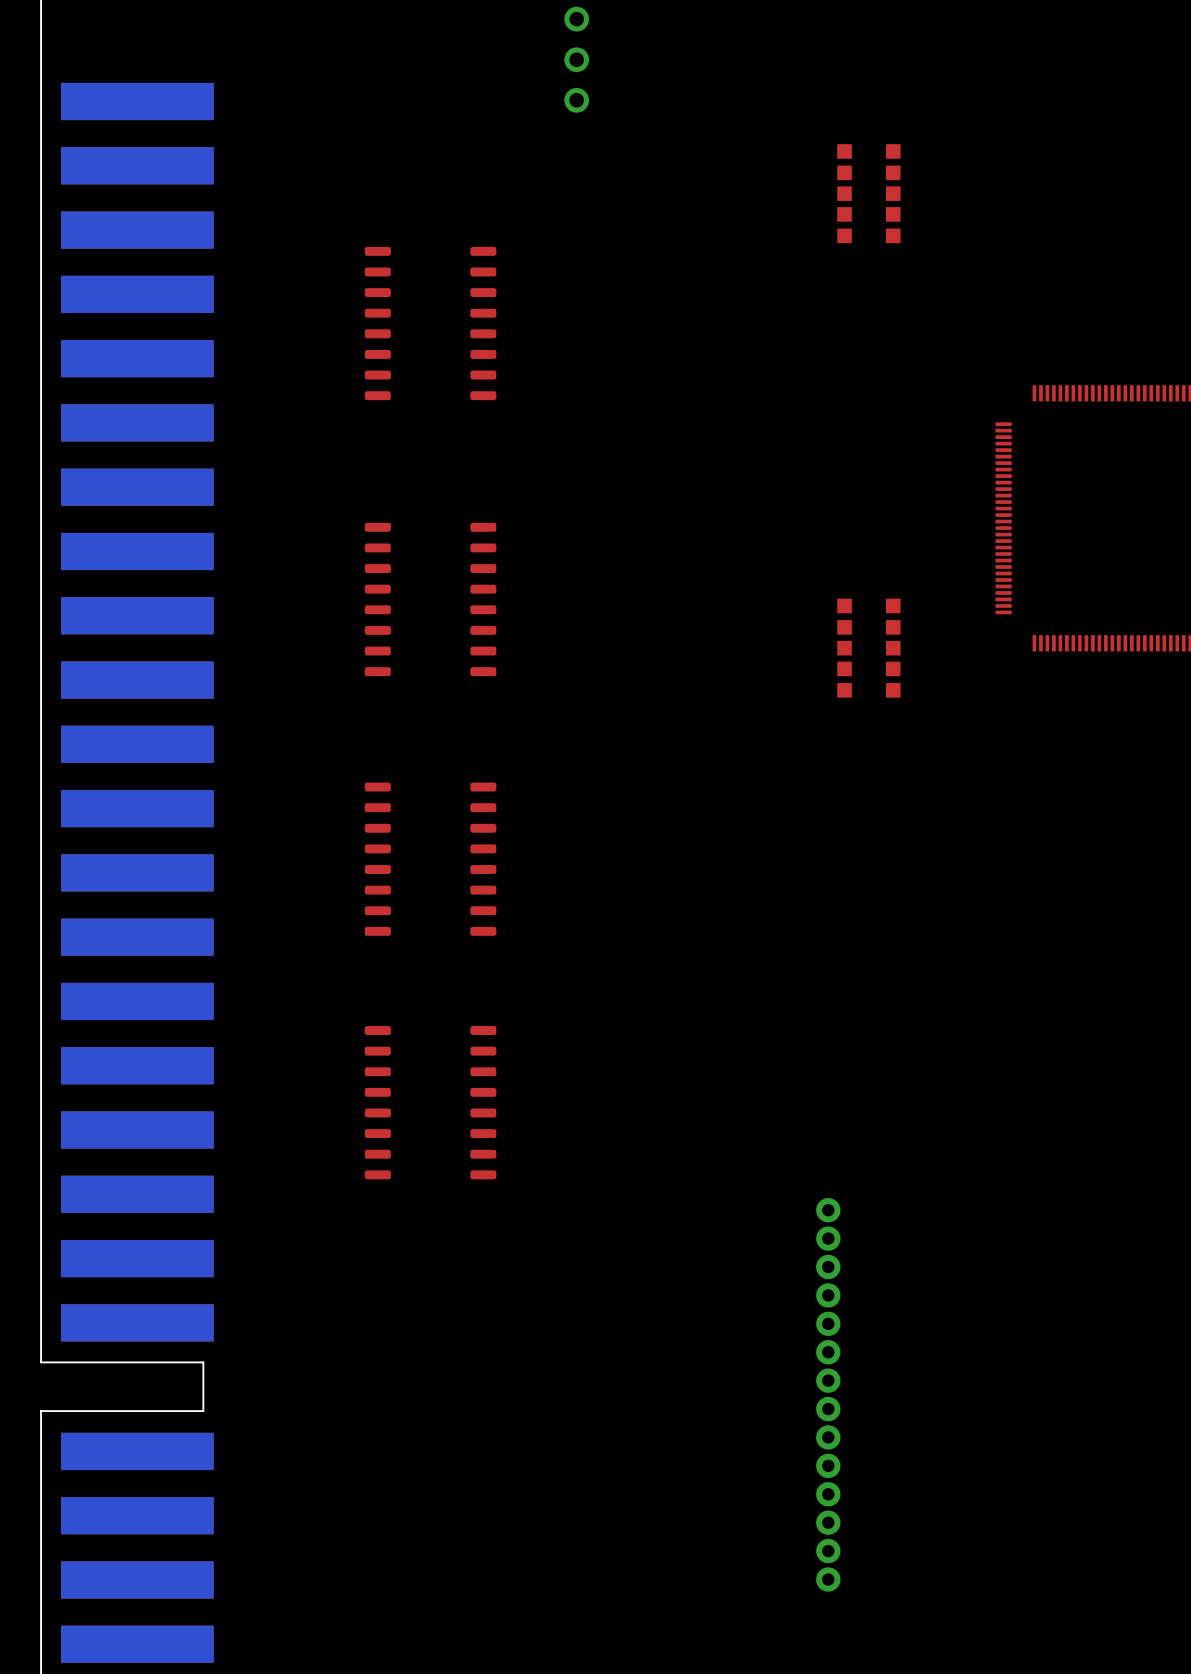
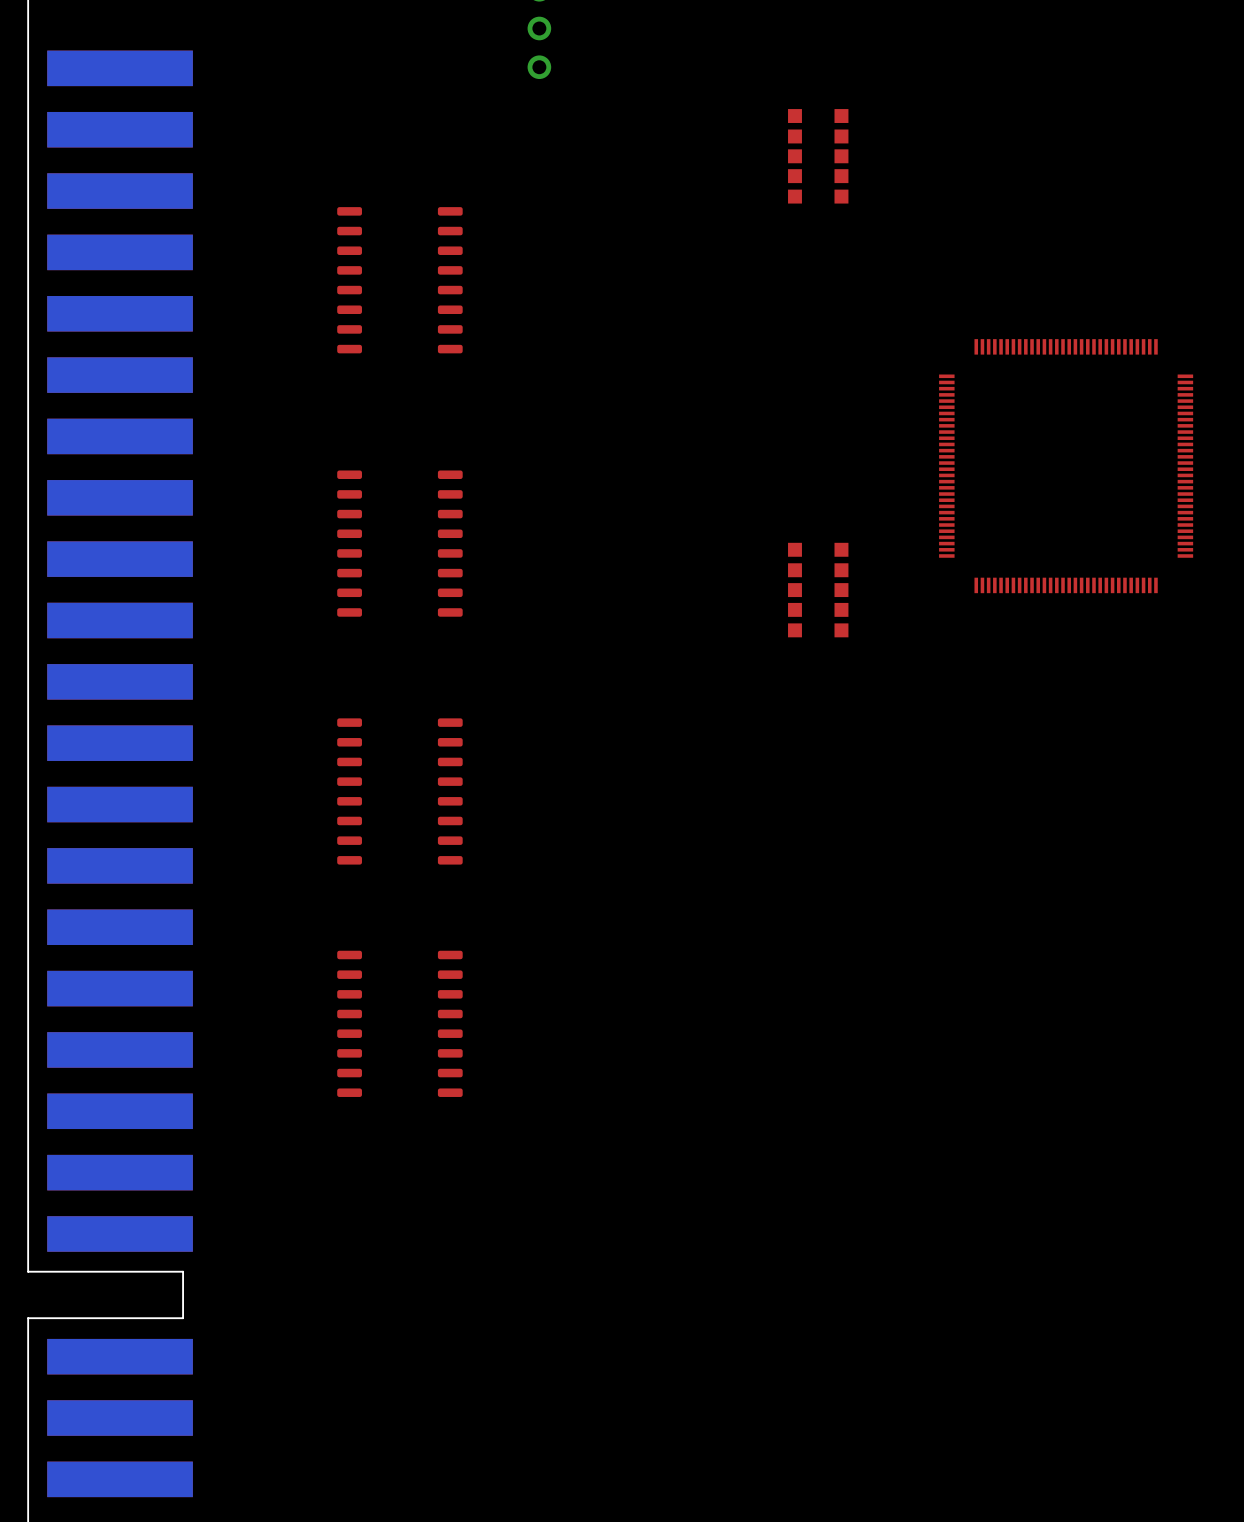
part: (828, 1394) -> none

